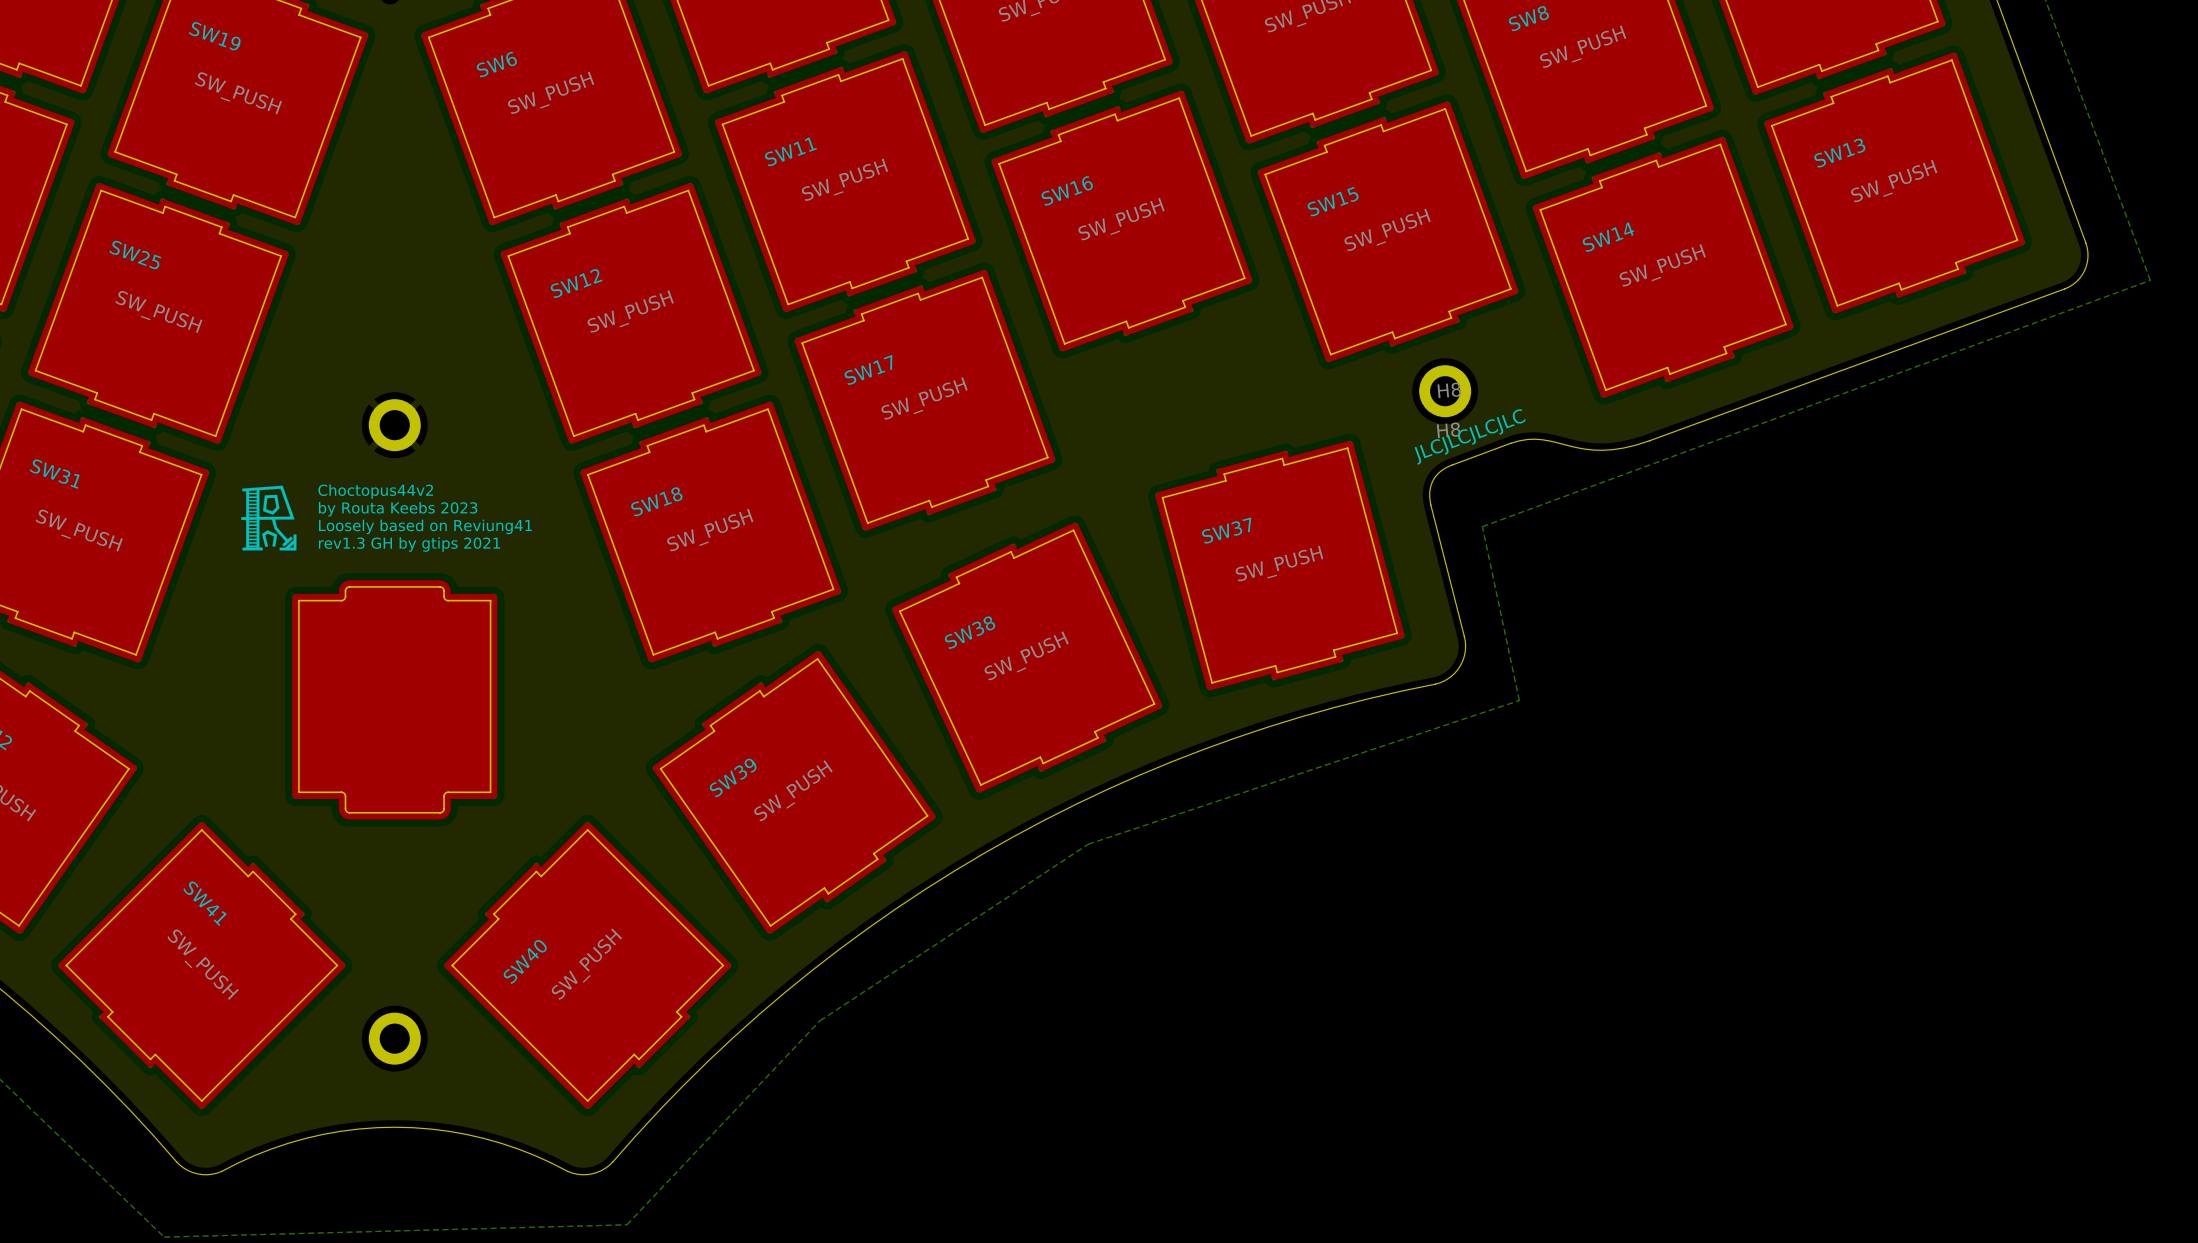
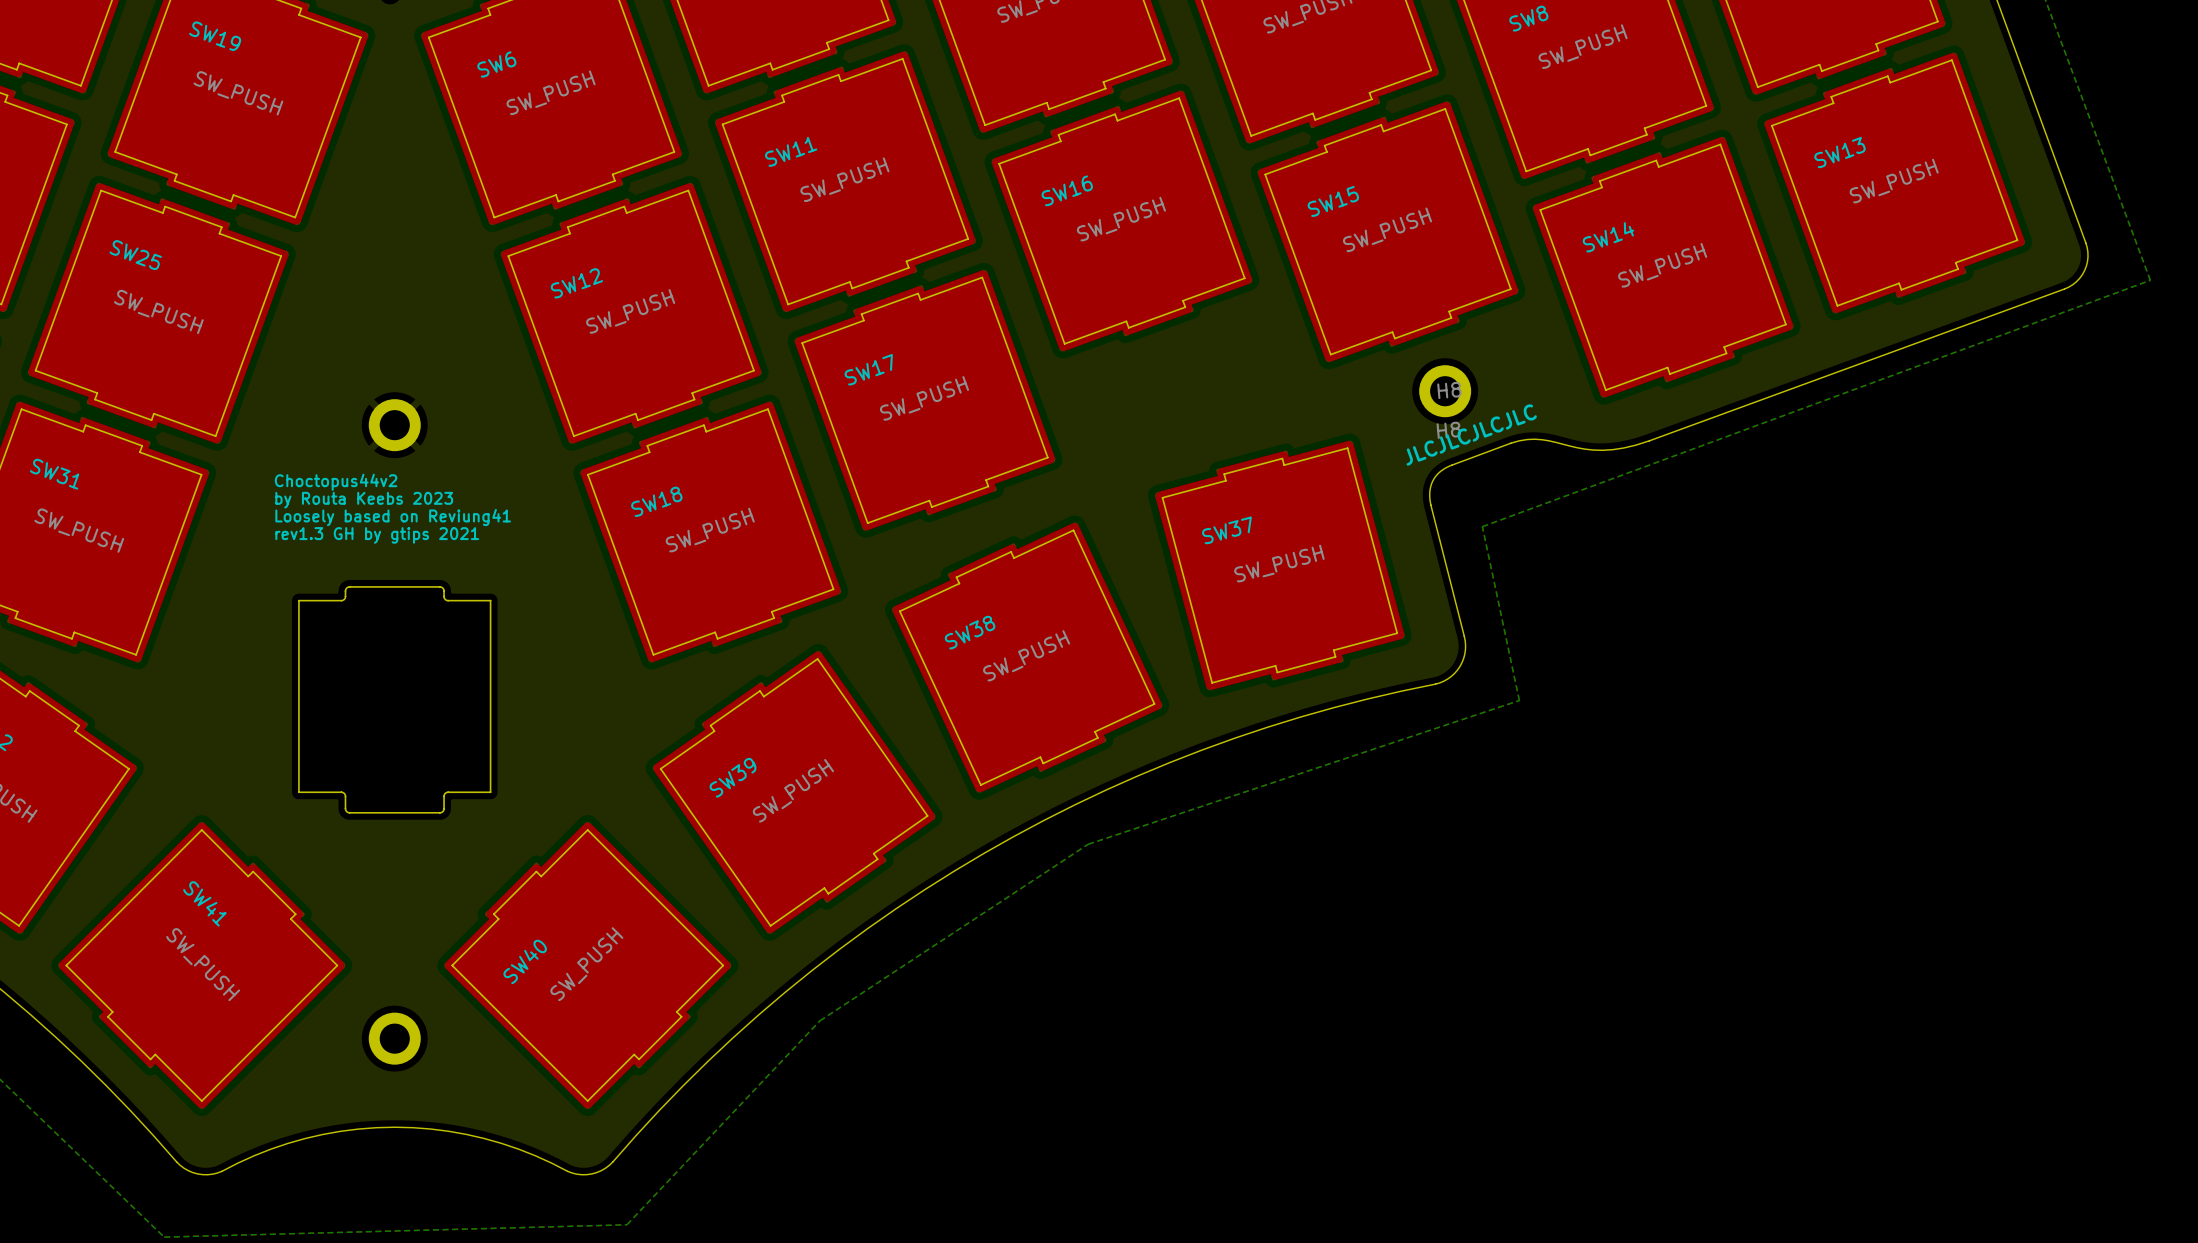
drawing: [241, 485, 297, 551] -> none
text position: Choctopus44v2 (375, 491) -> Choctopus44v2 (336, 482)
text position: by Routa Keebs 2023 (398, 509) -> by Routa Keebs 2023 (364, 500)
text position: Loosely based on Reviung41 (425, 526) -> Loosely based on Reviung41 (393, 517)
text position: rev1.3 GH by gtips 2021 (409, 544) -> rev1.3 GH by gtips 2021 (377, 535)
drawing: none -> [298, 586, 492, 814]
part: (394, 699) -> none

